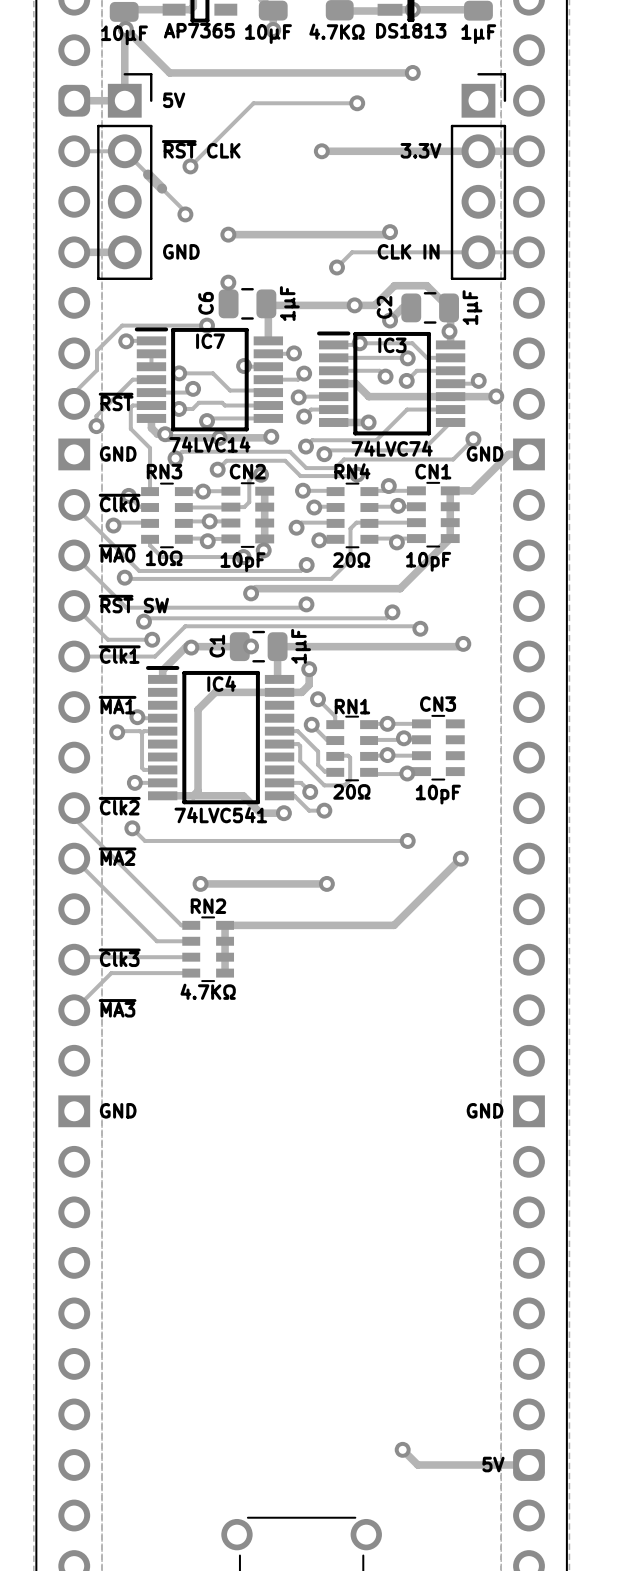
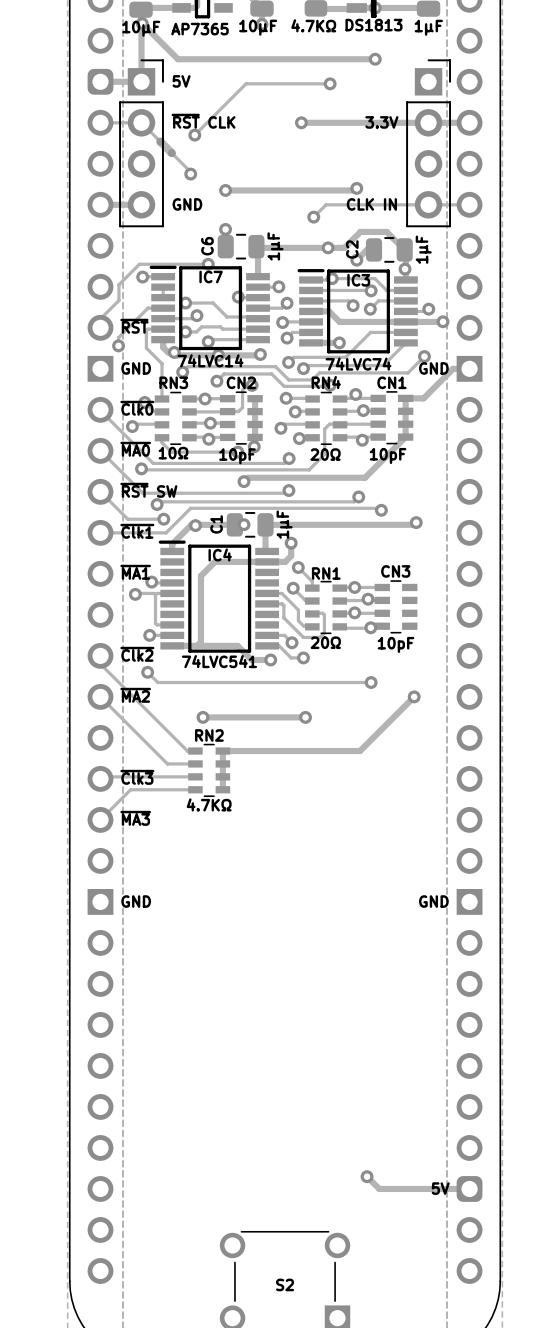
part text: AP7365 (199, 30) -> none
part text: none -> AP7365 (199, 29)

